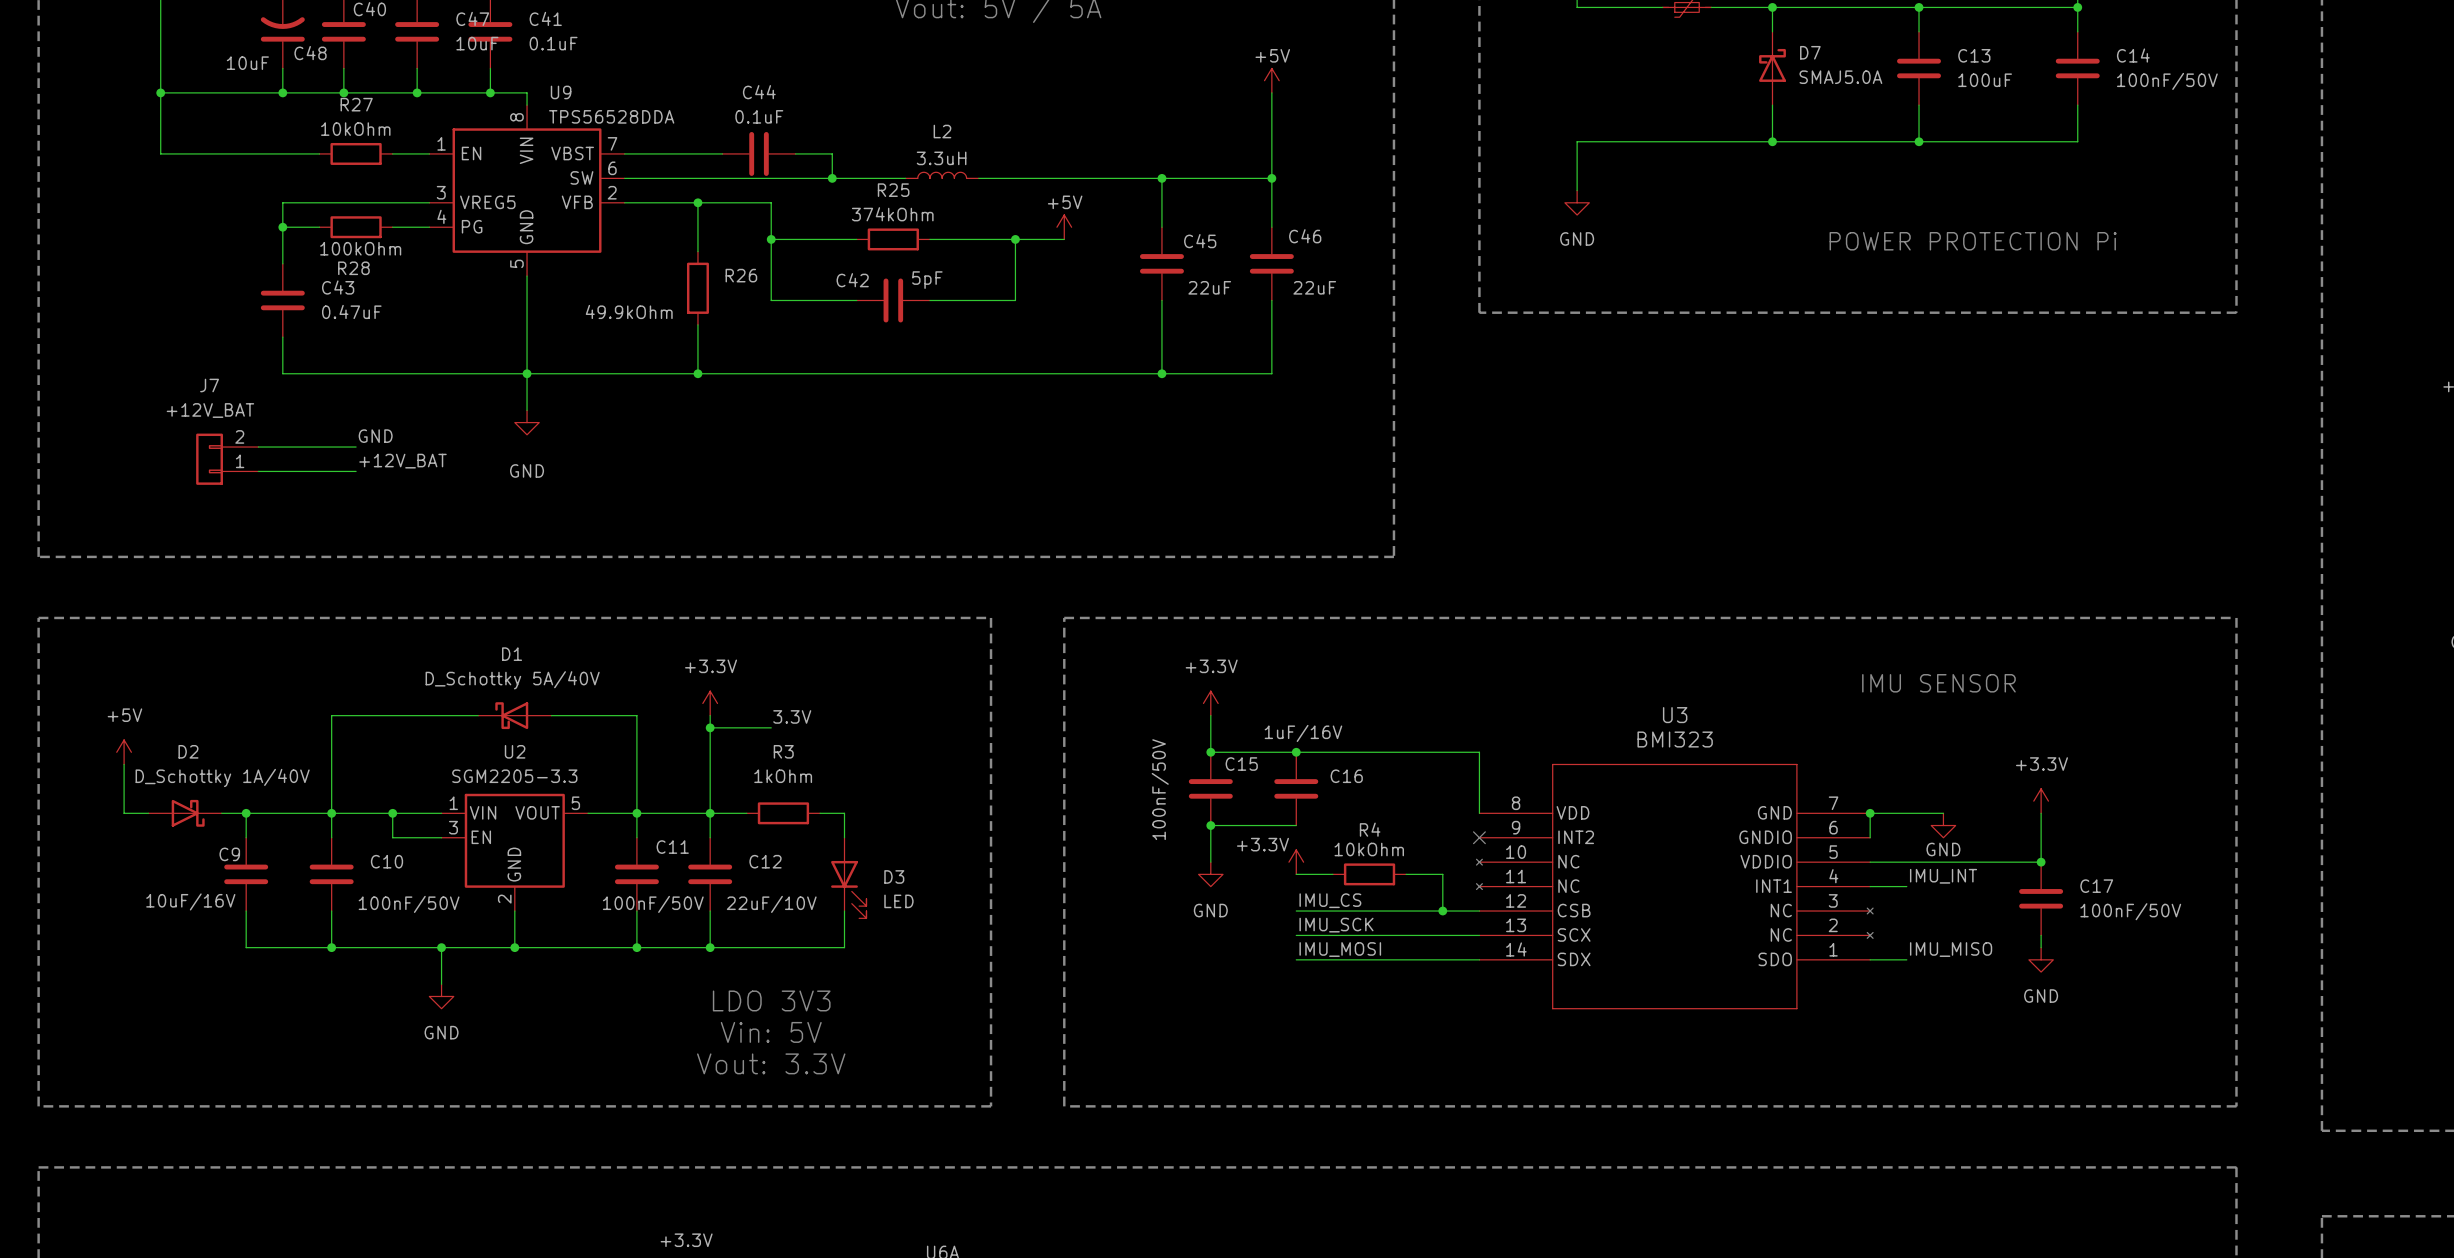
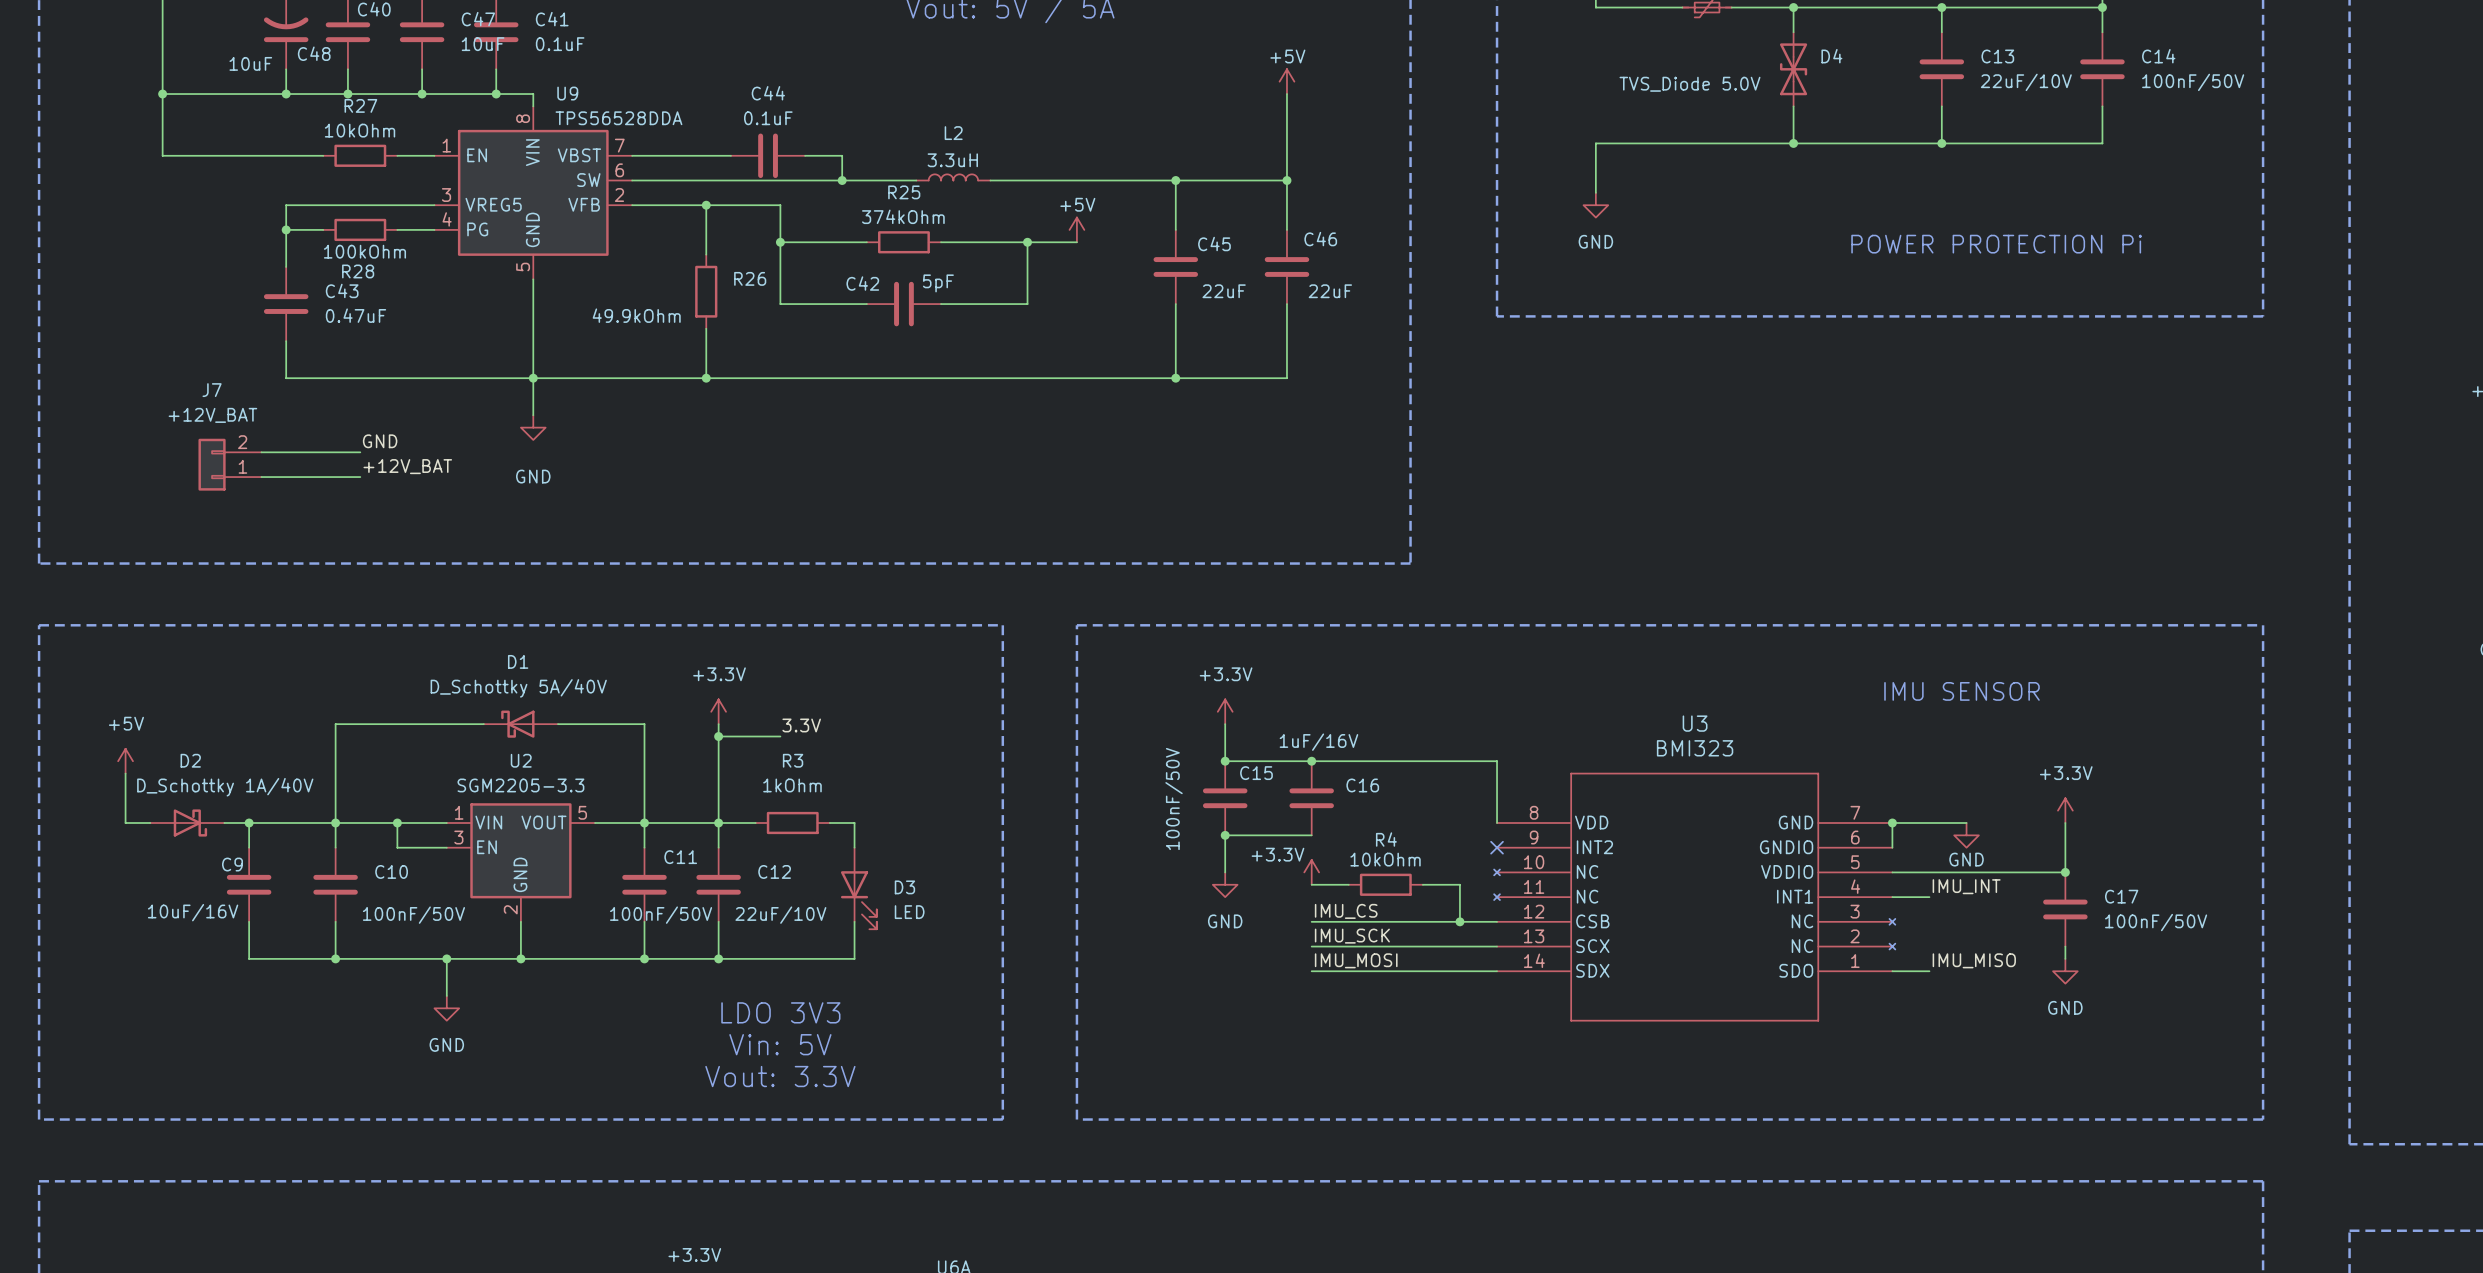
D7: SMAJ5.0A (1772, 68) -> none
D4: none -> TVS_Diode 5.0V (1793, 69)
C13 value: 100uF (1985, 80) -> 22uF/10V (2026, 82)

